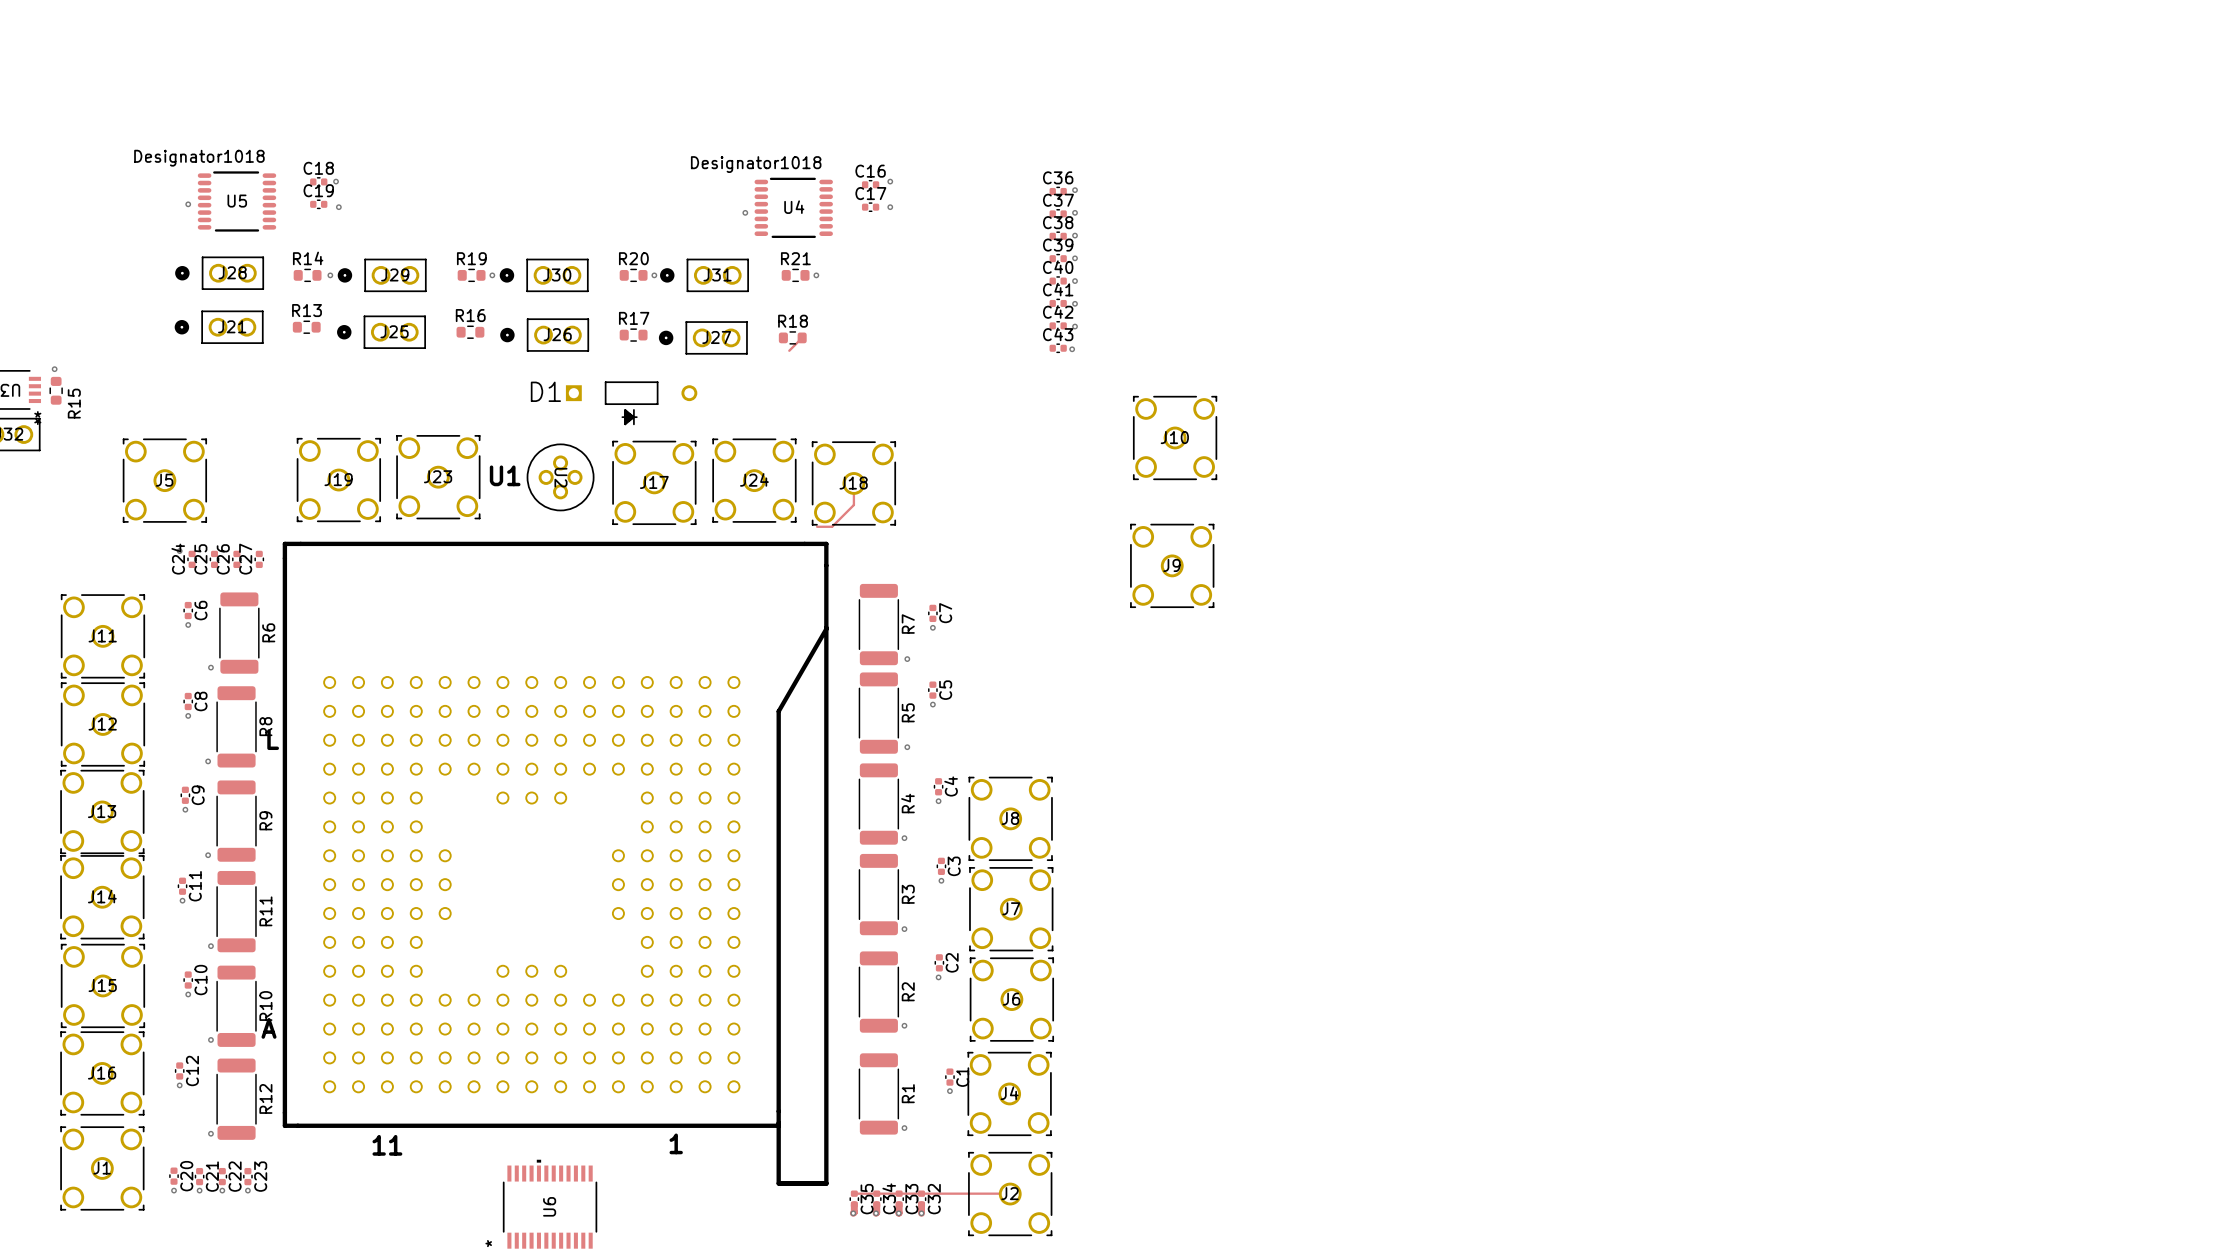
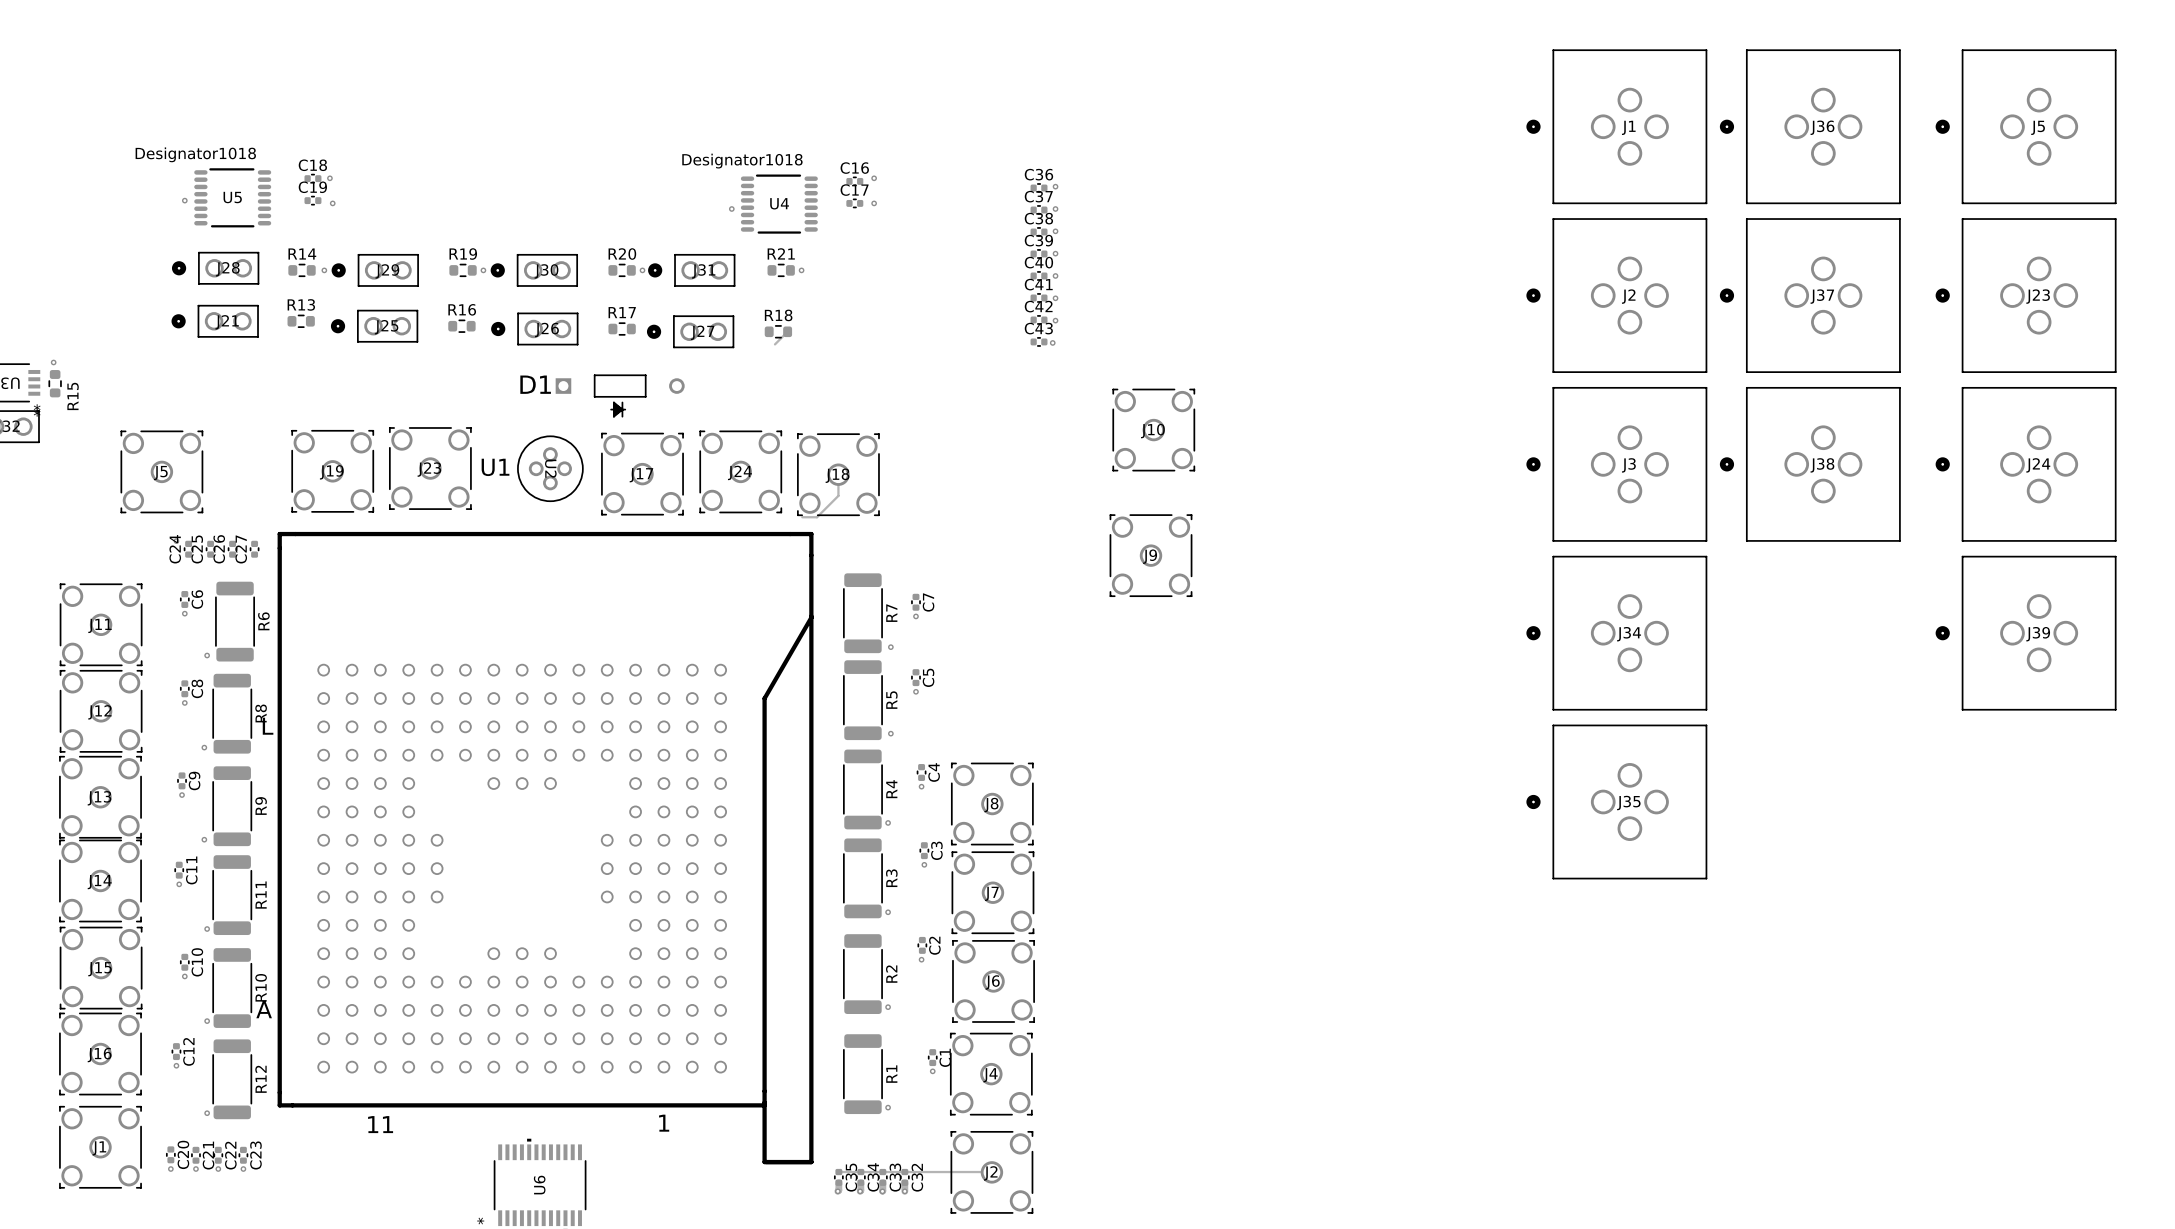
J1: none -> (1616, 126)
J36: none -> (1810, 126)
J5: none -> (2026, 126)
J2: none -> (1616, 295)
J37: none -> (1810, 295)
J23: none -> (2026, 295)
J3: none -> (1616, 464)
J38: none -> (1810, 464)
J24: none -> (2026, 464)
J34: none -> (1616, 633)
J39: none -> (2026, 633)
J35: none -> (1616, 802)

